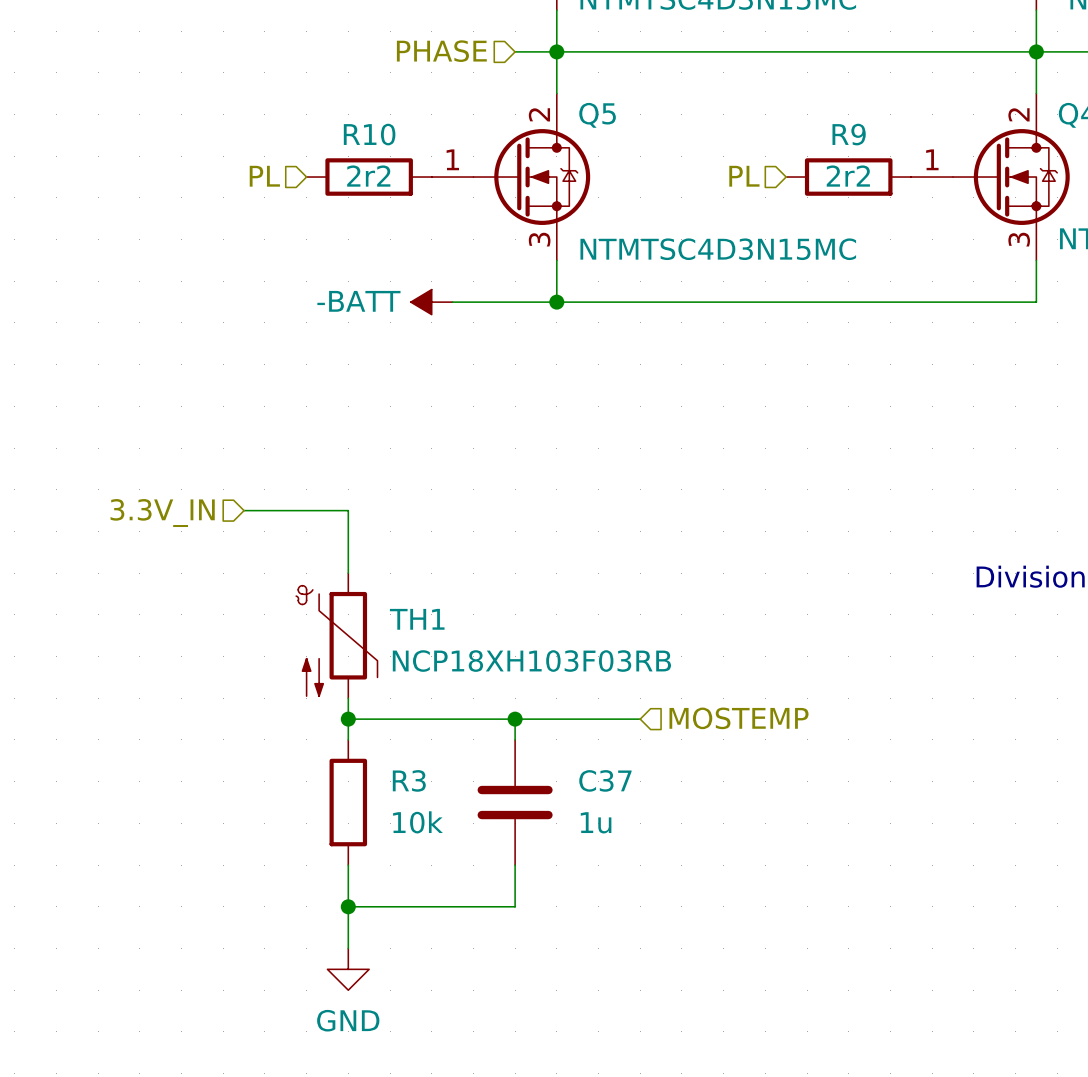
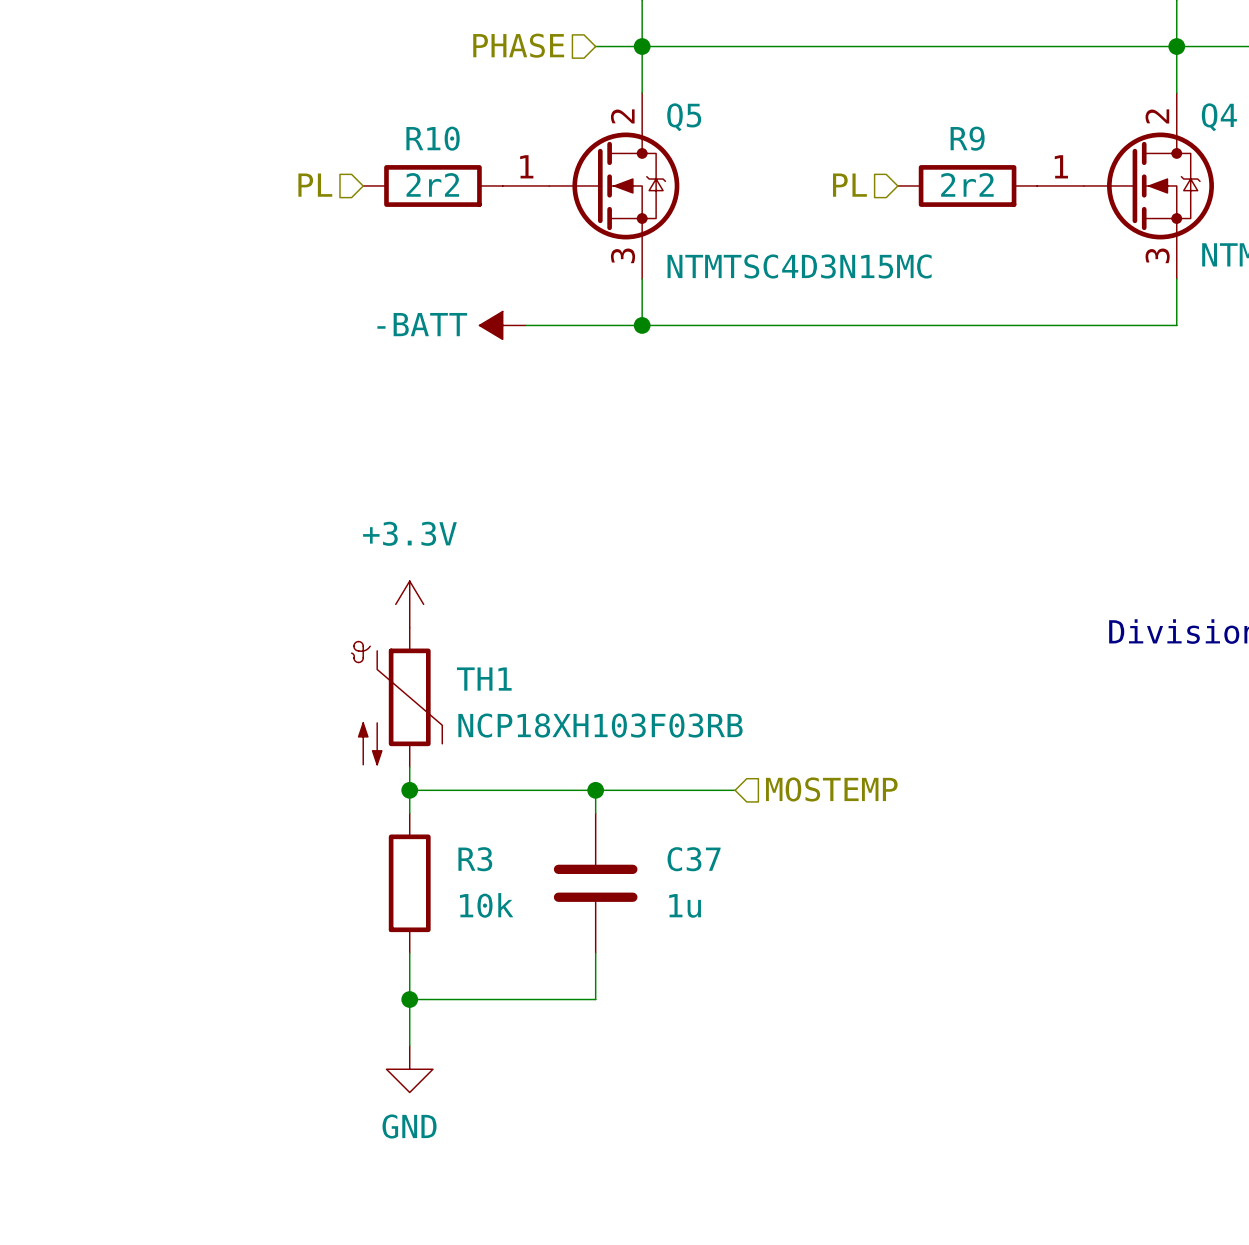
wire: (244, 510) (348, 510) (348, 573) -> none
hierarchical label: 3.3V_IN (162, 513) -> none
power symbol: none -> +3.3V (409, 604)

